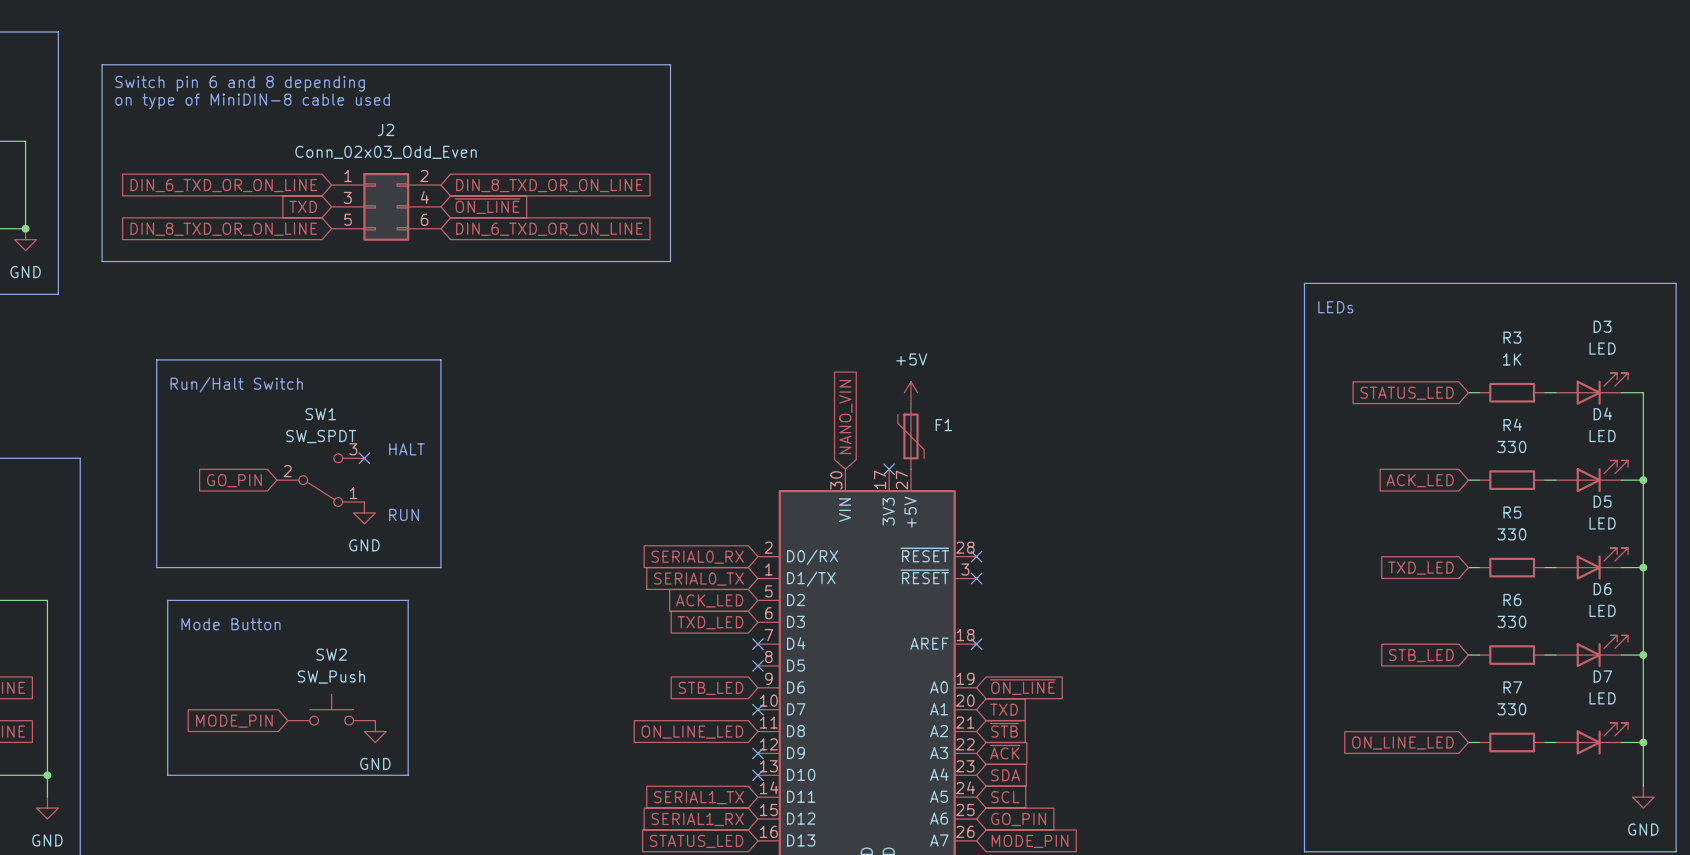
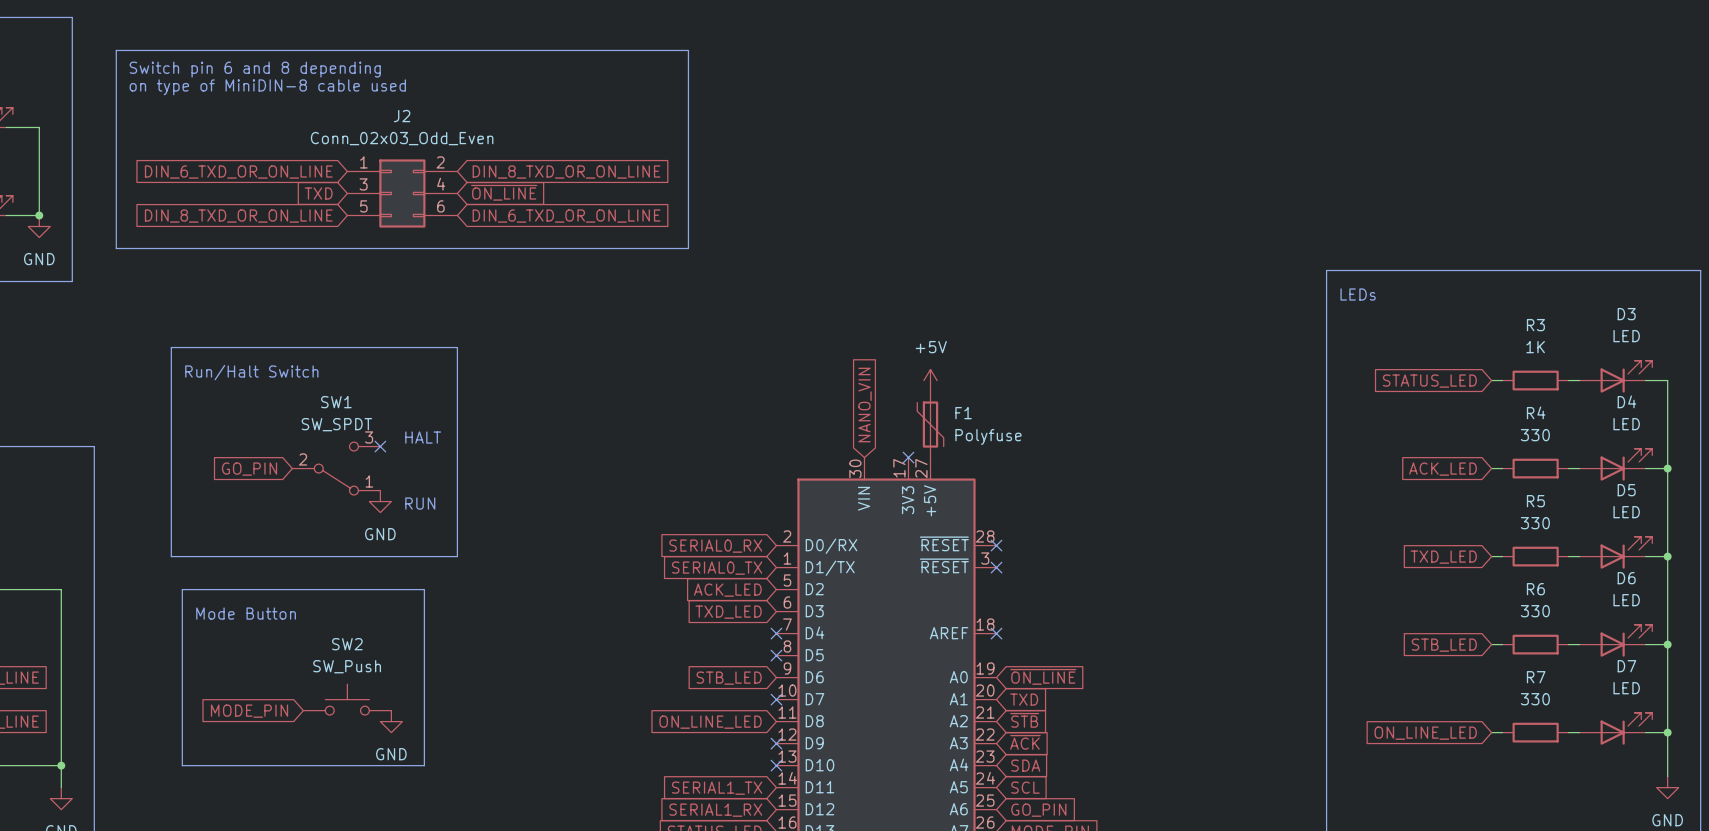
F1 value: none -> Polyfuse (988, 436)

